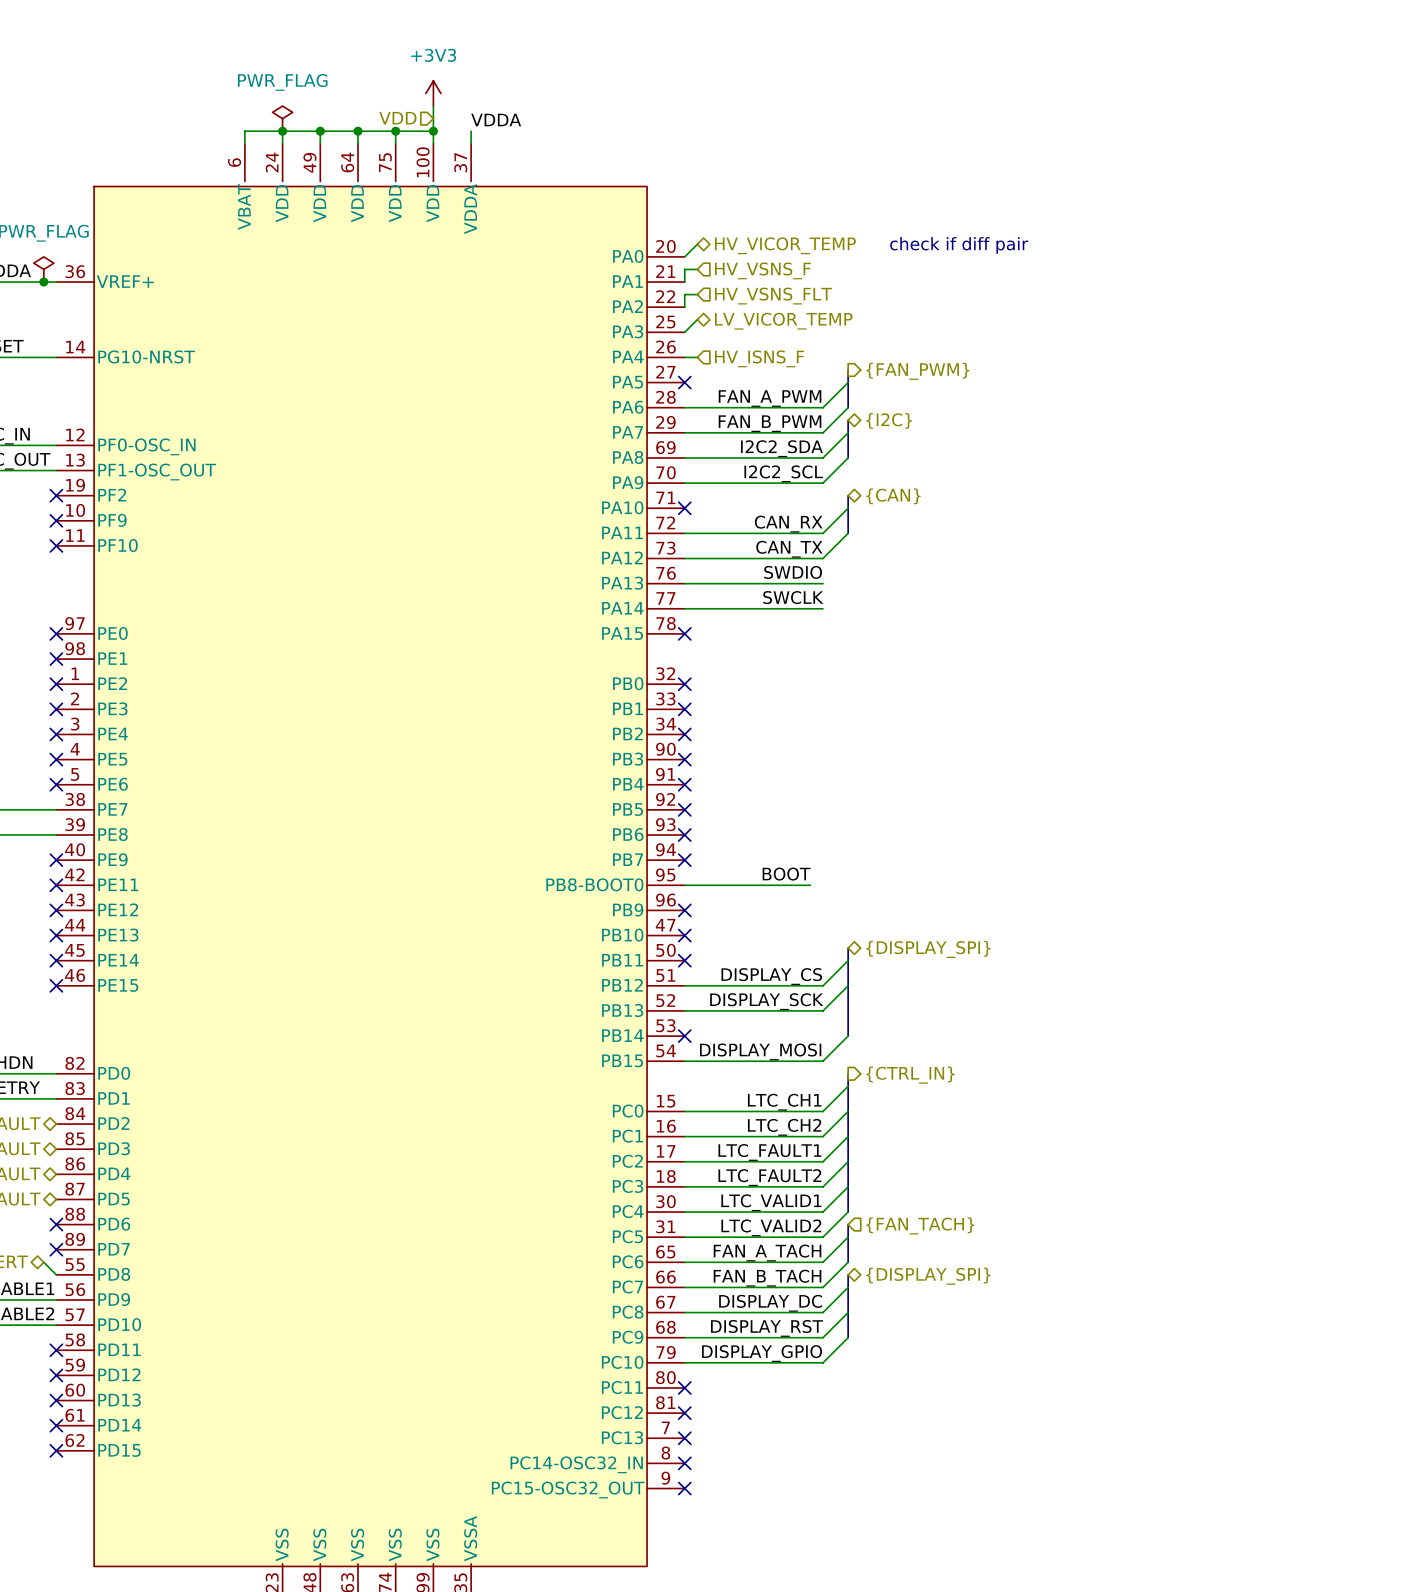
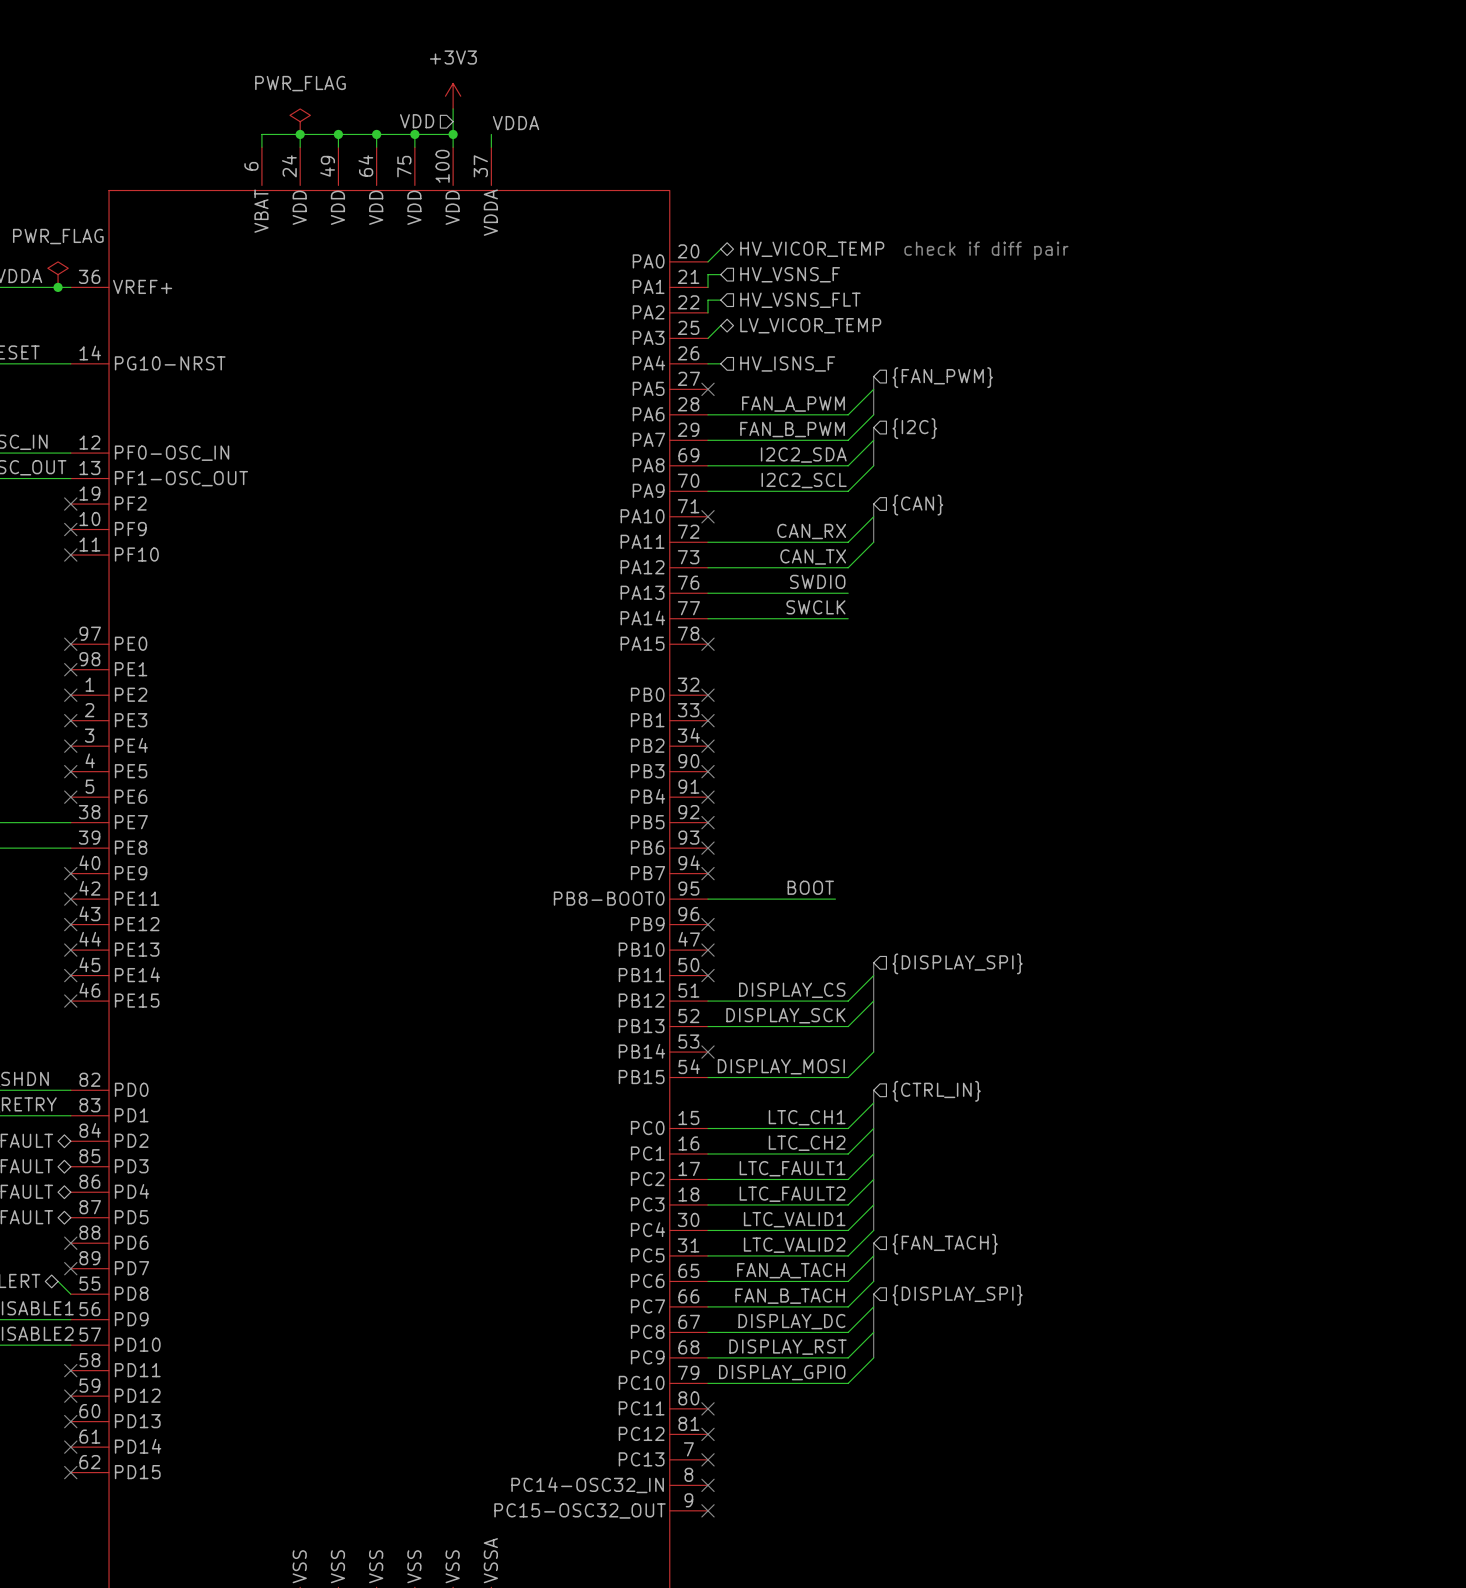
hierarchical label shape: output (917, 371) -> input (942, 377)
hierarchical label shape: bidirectional (889, 420) -> input (914, 428)
hierarchical label shape: bidirectional (893, 496) -> input (917, 505)
hierarchical label shape: bidirectional (928, 949) -> input (957, 963)
hierarchical label shape: output (910, 1075) -> input (936, 1091)
hierarchical label shape: bidirectional (928, 1276) -> input (957, 1295)

